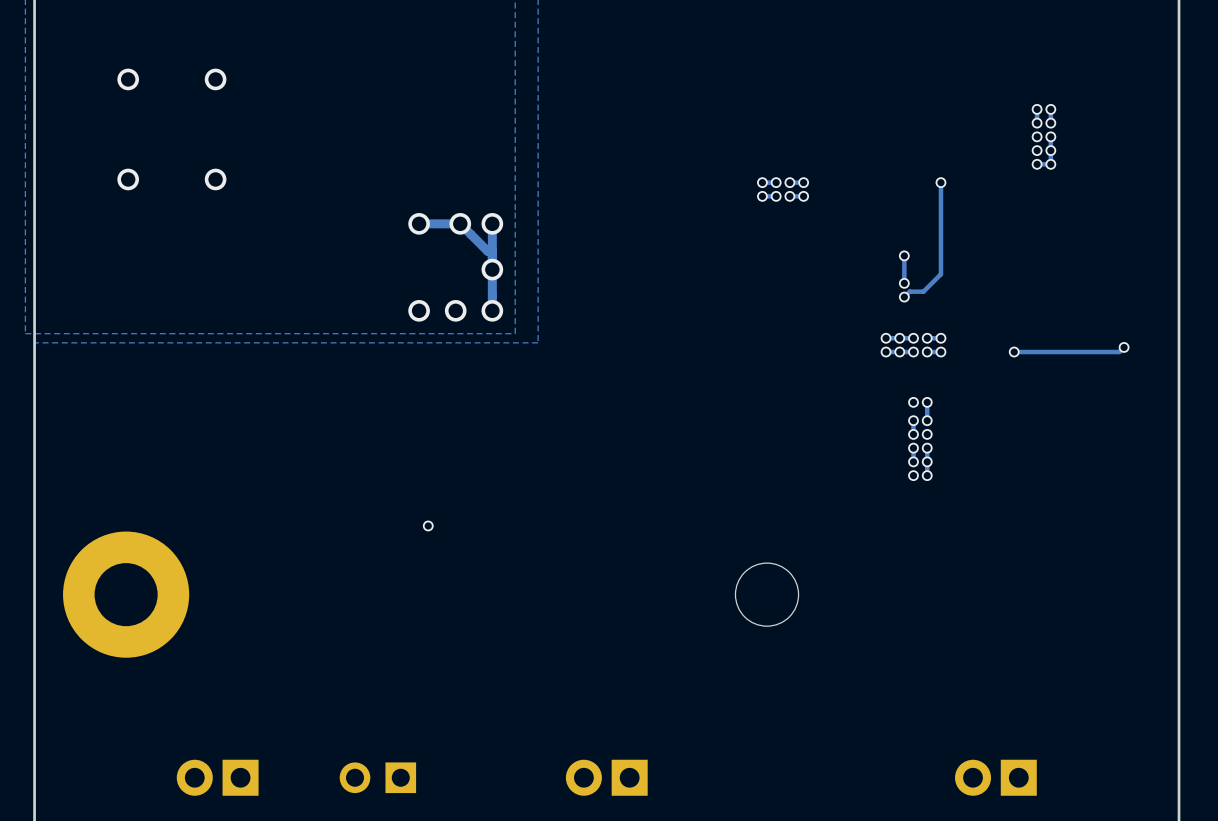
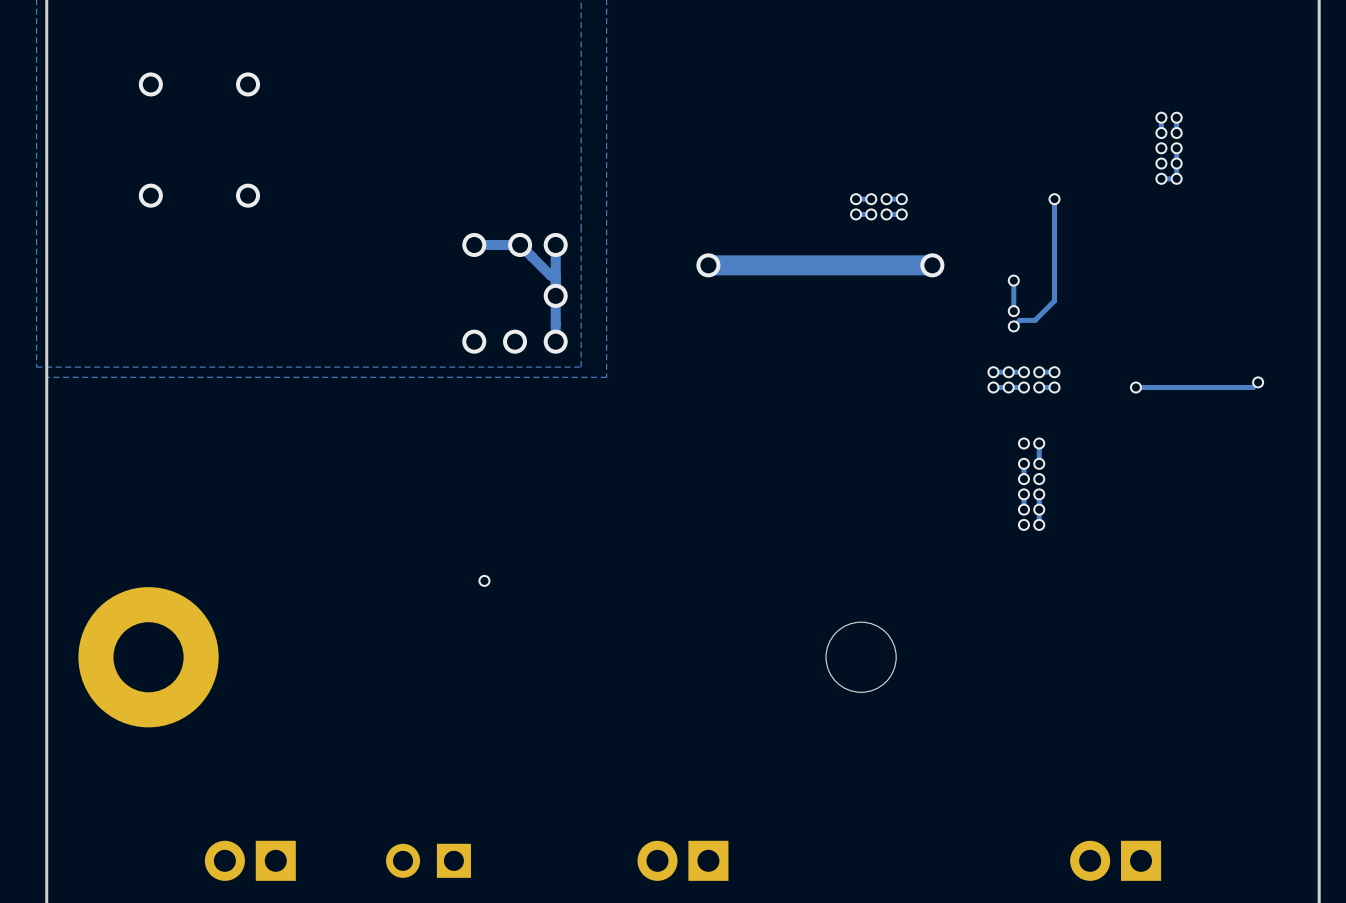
via: none -> (708, 265)
track: none -> (932, 265) (708, 265)
via: none -> (932, 265)

